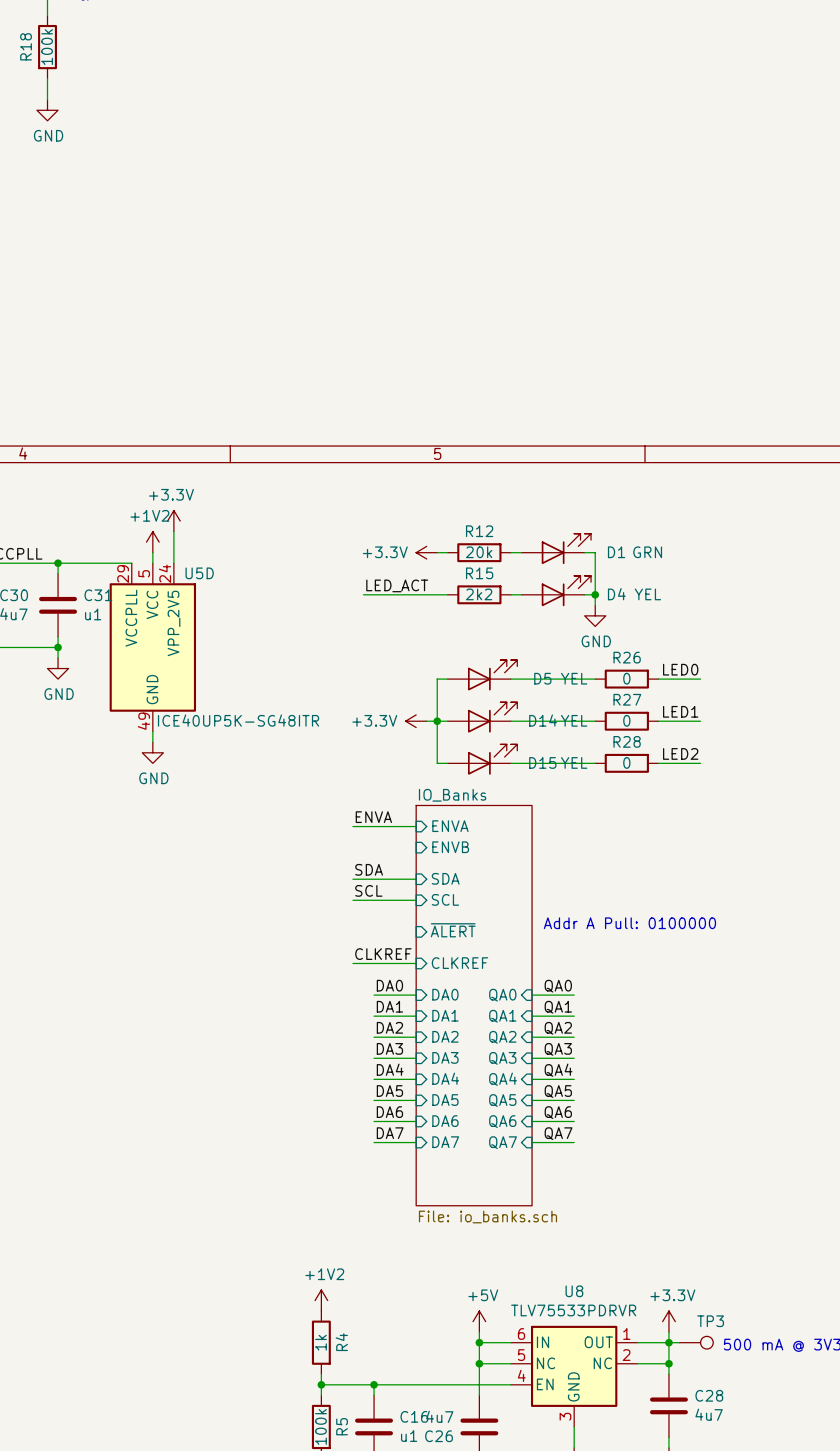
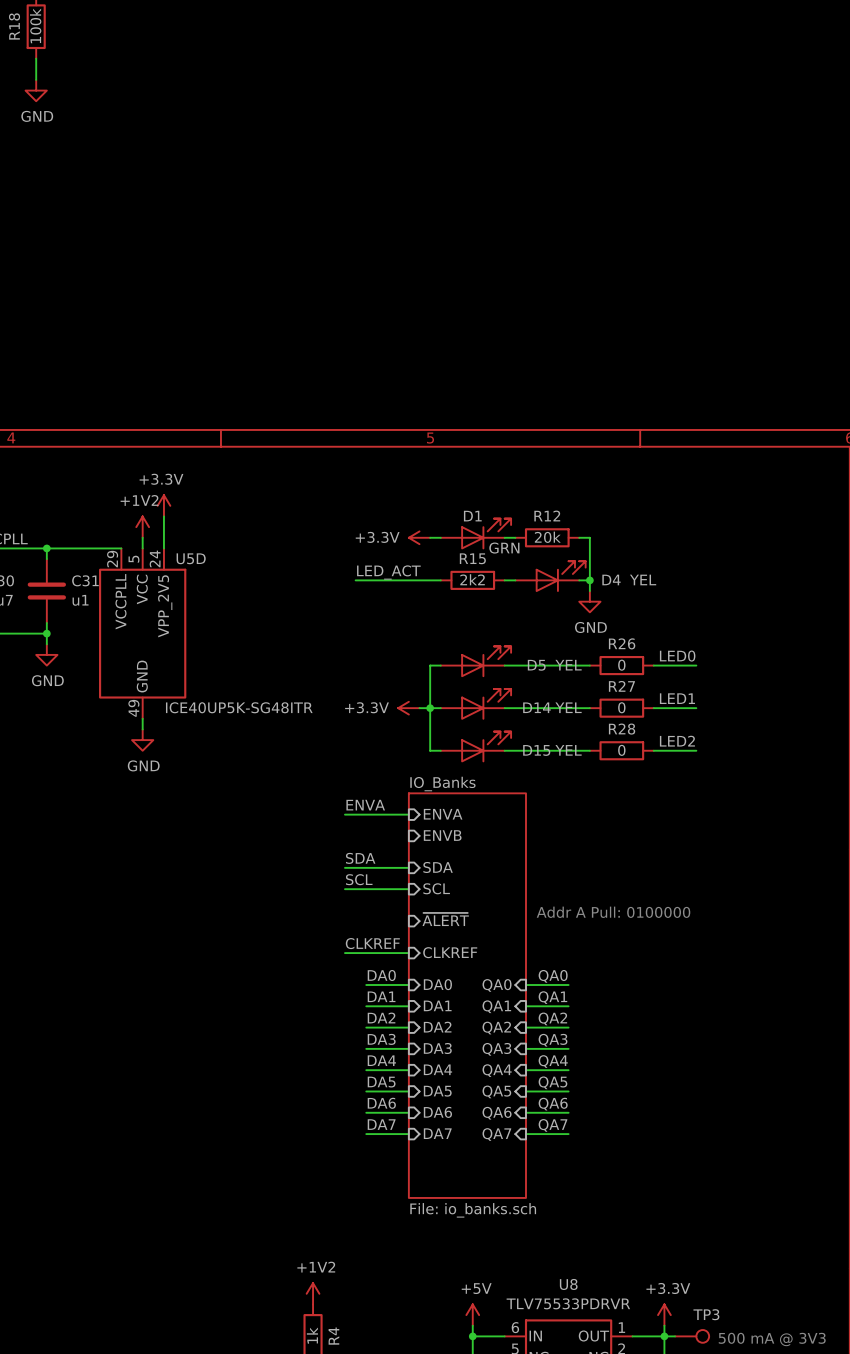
D1 position: (556, 548) -> (475, 533)
R12 position: (479, 552) -> (547, 537)
D1 name position: D1 (616, 552) -> D1 (472, 516)
D1 value position: GRN (647, 552) -> GRN (504, 548)

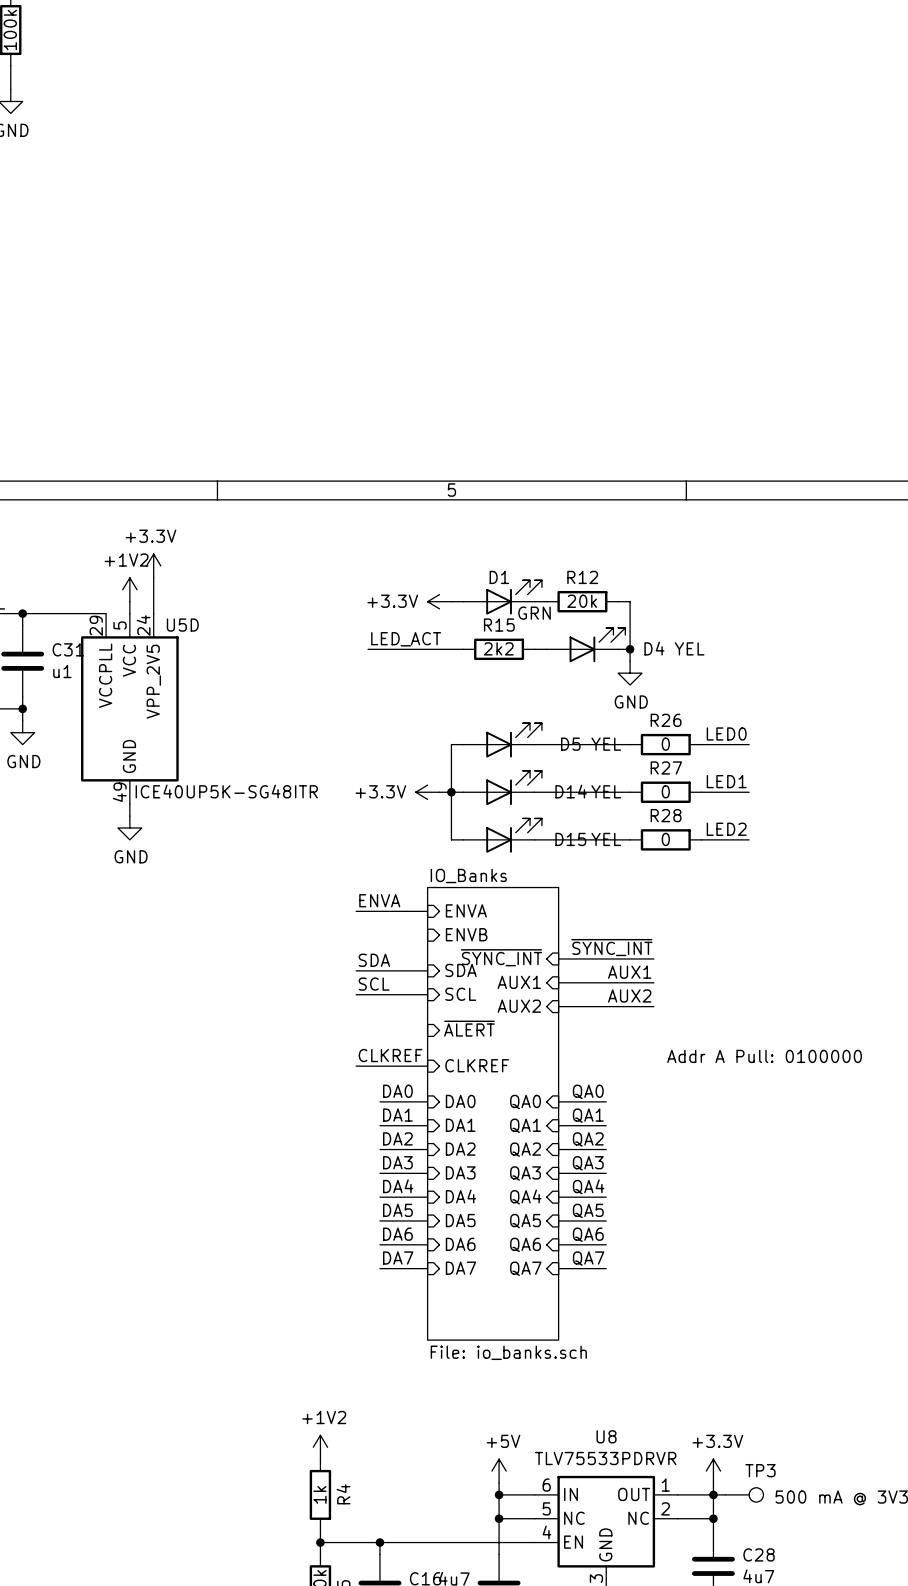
label: none -> ~{SYNC_INT} (611, 947)
sheet pin: none -> ~{SYNC_INT} (501, 957)
wire: none -> (558, 958) (653, 958)
label: none -> AUX1 (629, 972)
sheet pin: none -> AUX1 (519, 982)
wire: none -> (558, 982) (653, 982)
label: none -> AUX2 (629, 995)
sheet pin: none -> AUX2 (519, 1006)
wire: none -> (558, 1006) (653, 1006)
text position: Addr A Pull: 0100000 (613, 912) -> Addr A Pull: 0100000 (764, 1056)

